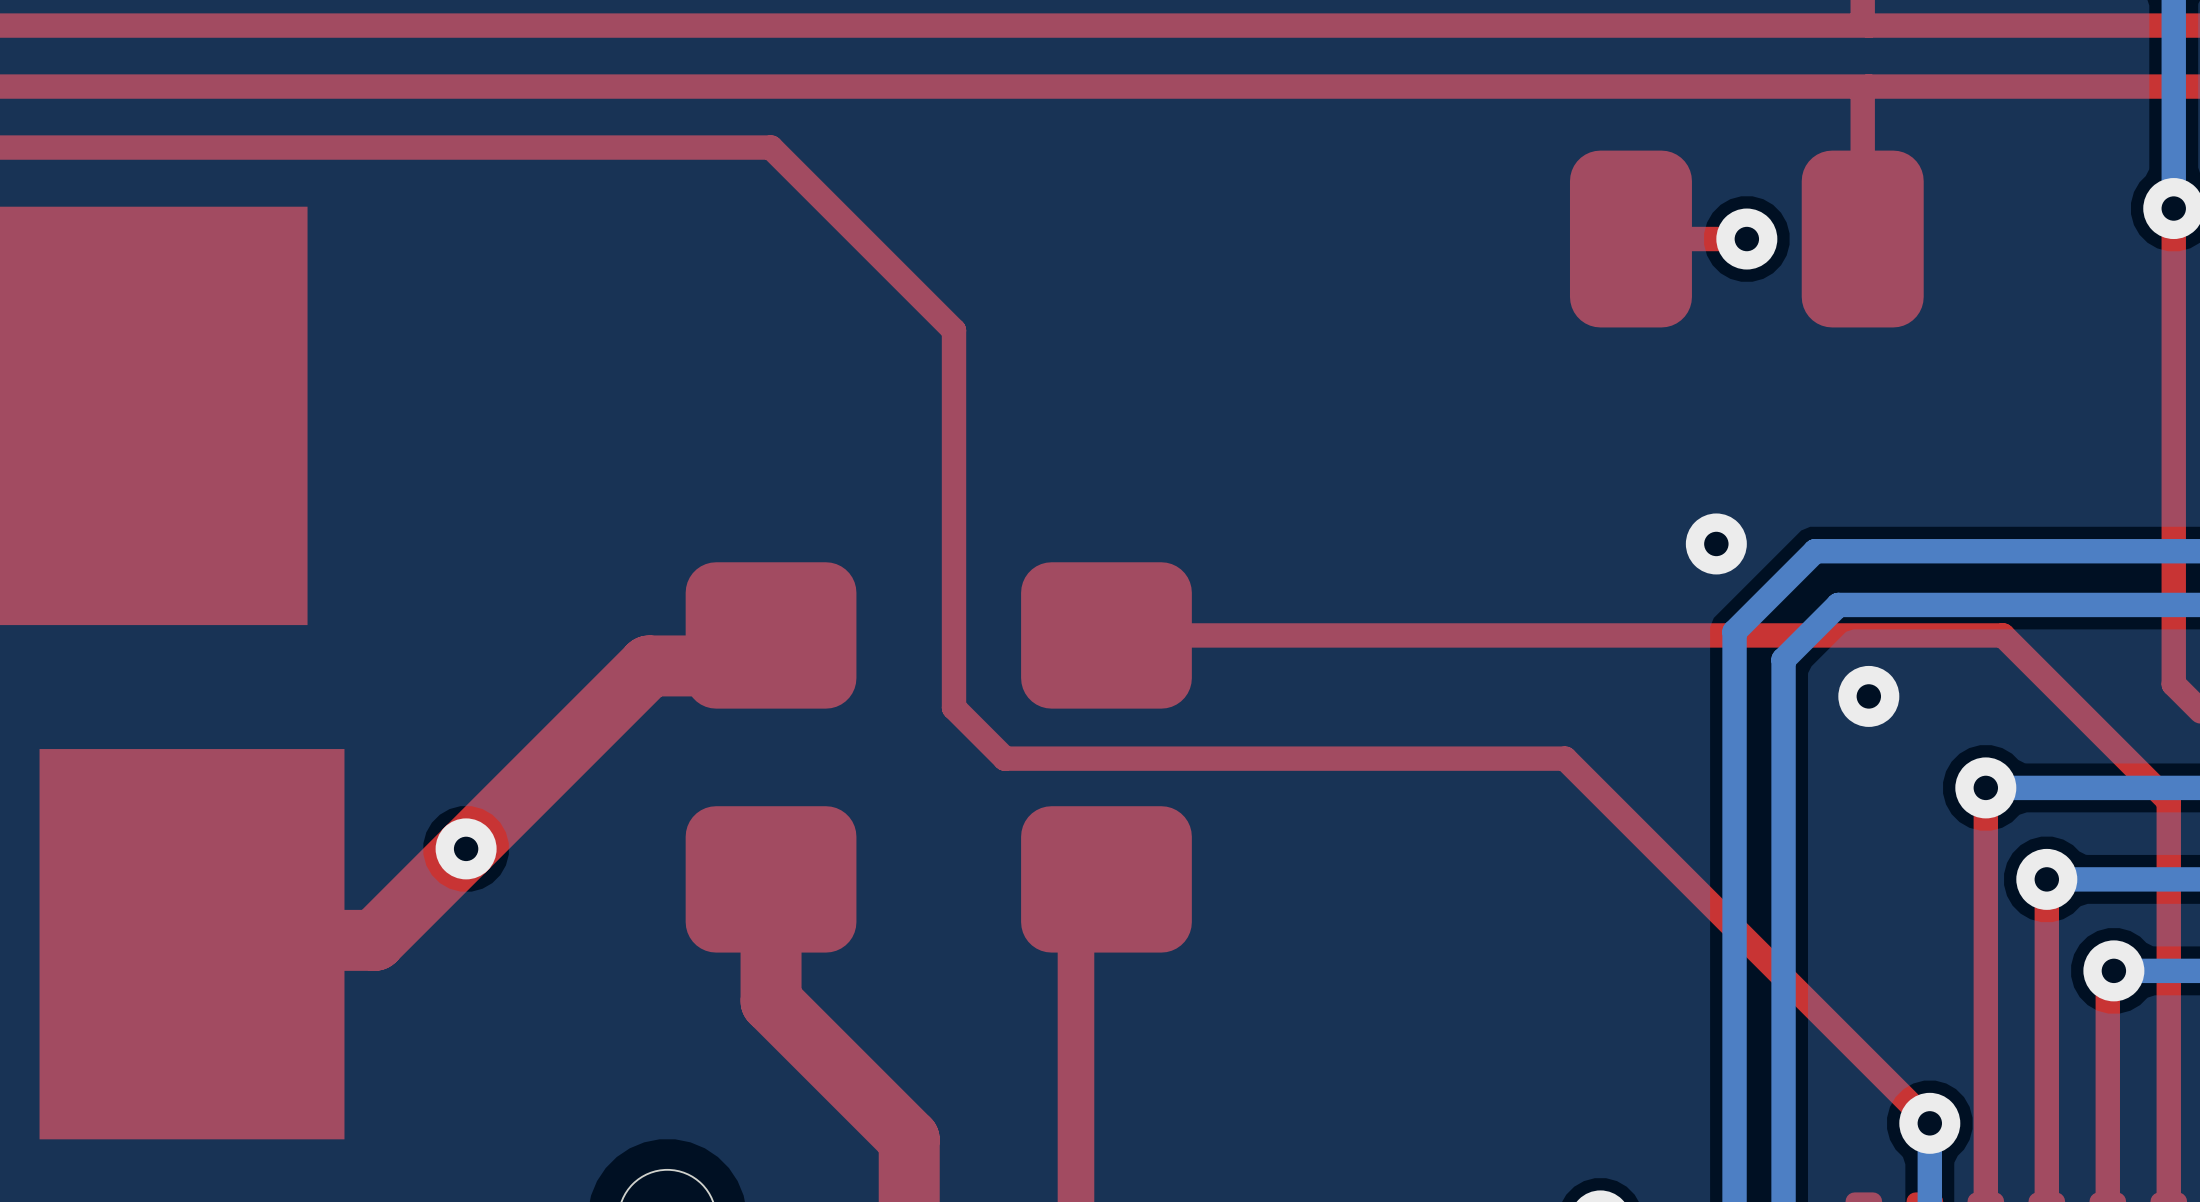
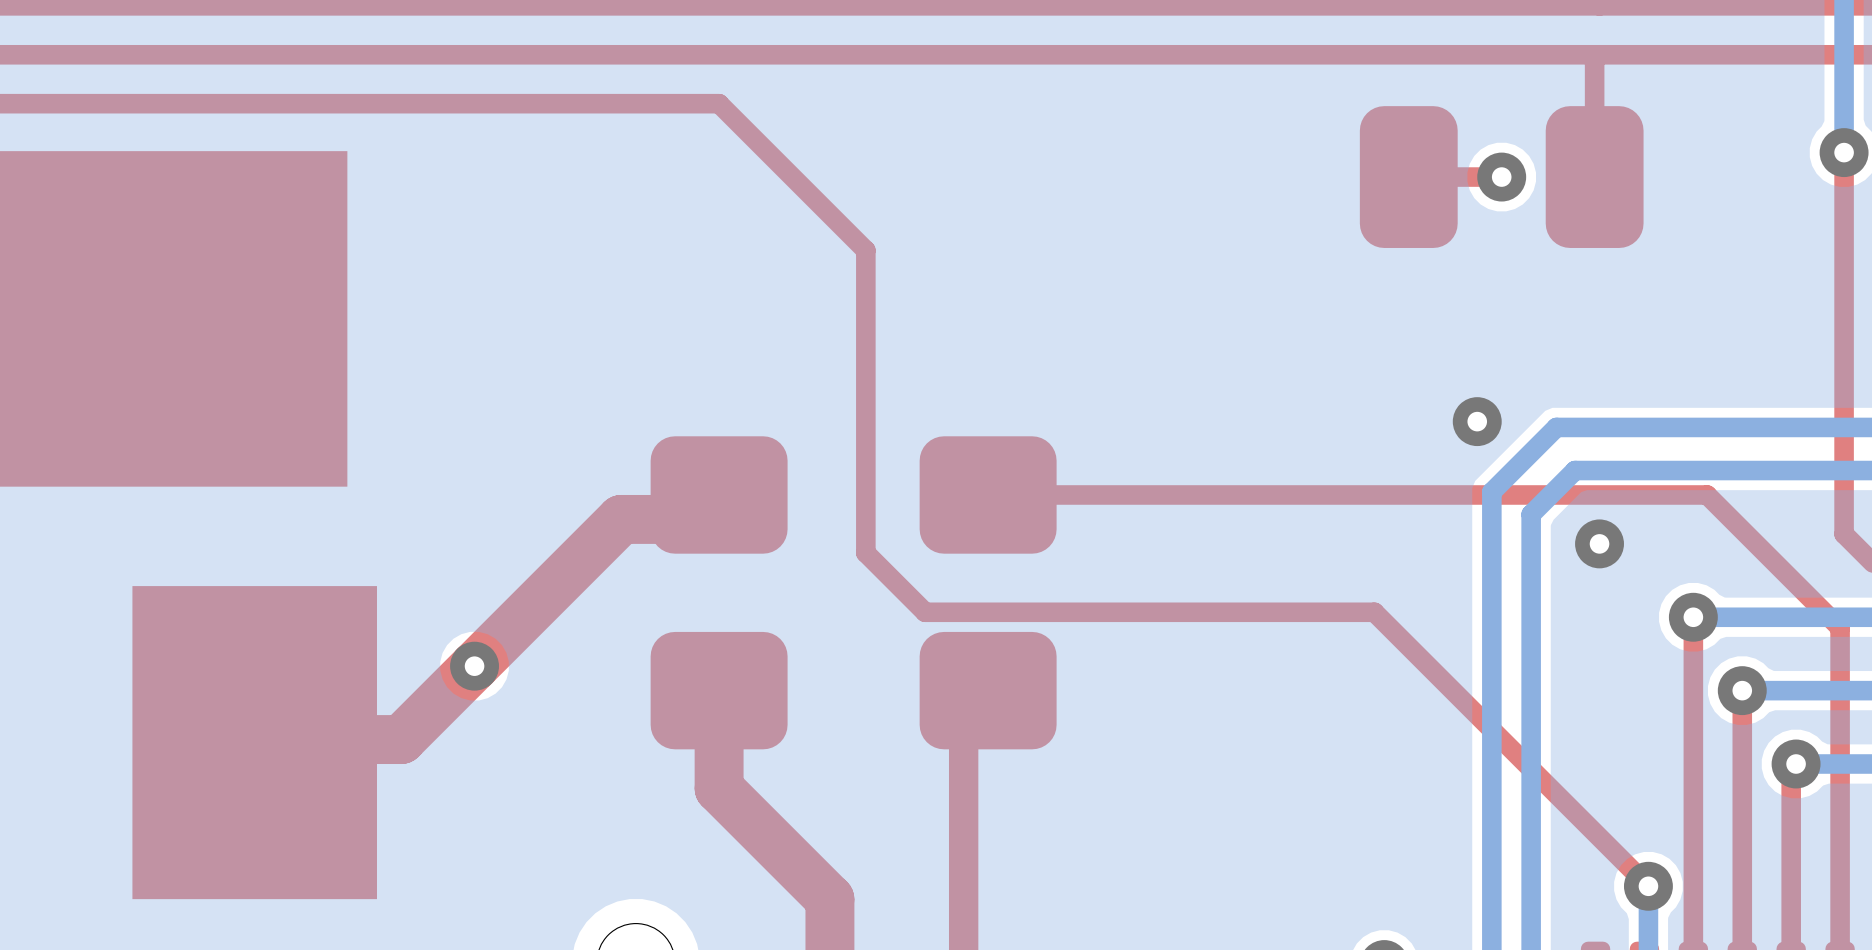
top track: (1004, 758) (1565, 758) (1588, 781) -> (906, 593) (925, 612) (1374, 612)

